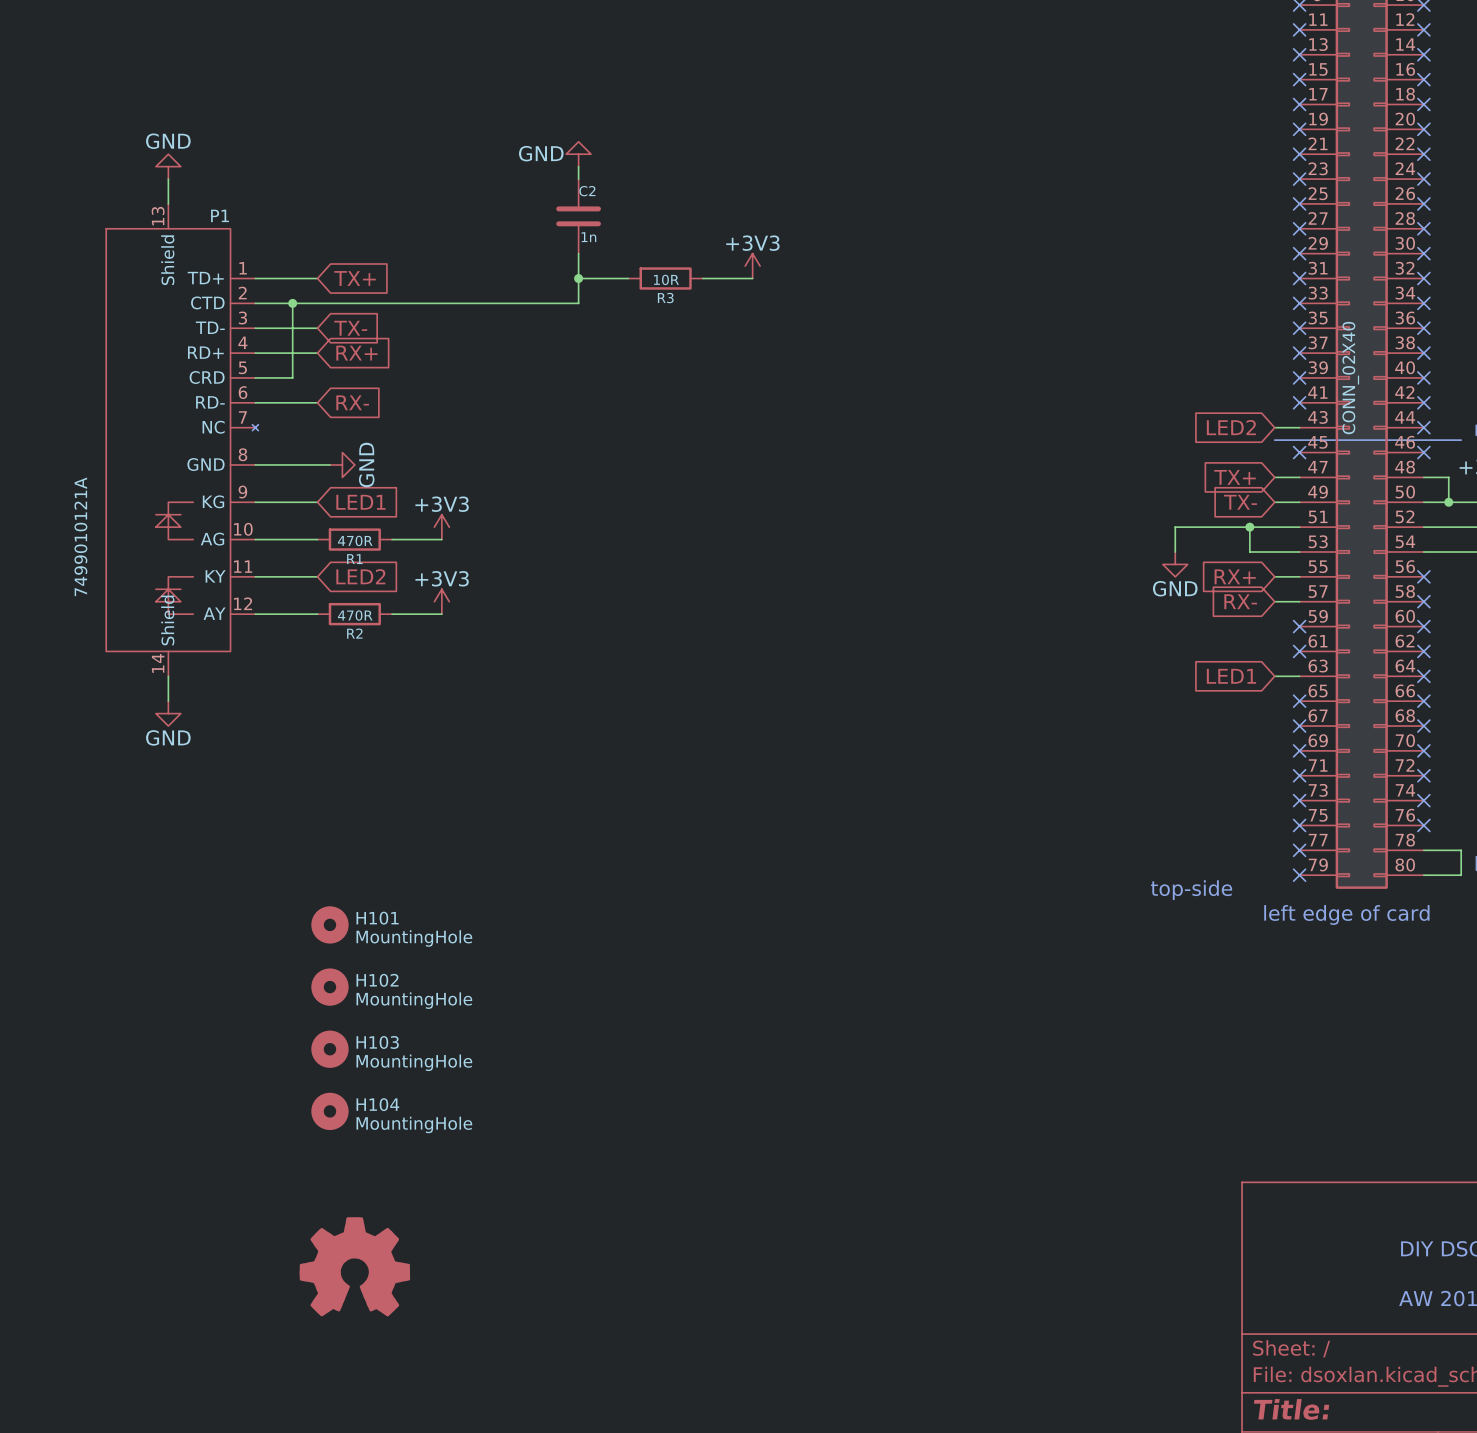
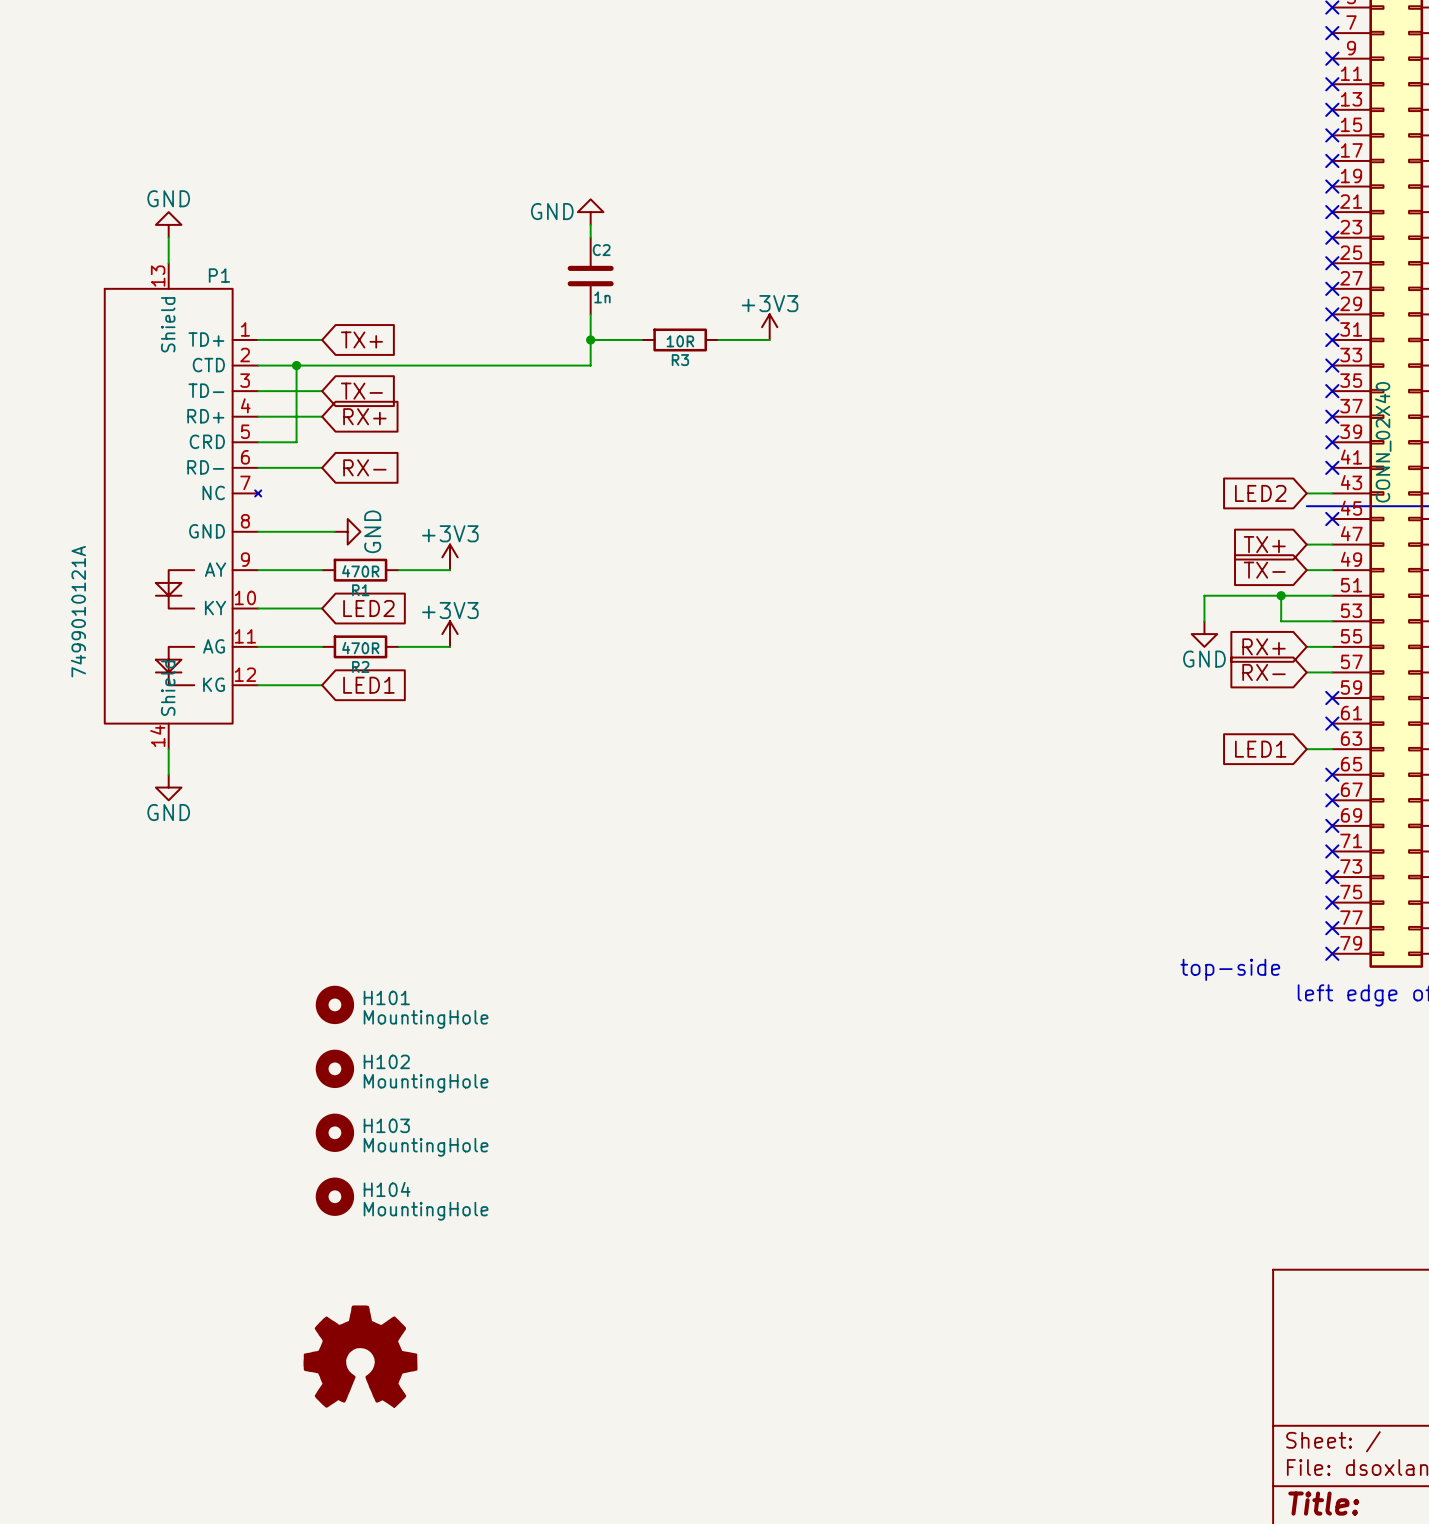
P1 symbol: [106, 203, 259, 677] -> [104, 263, 262, 750]
power symbol: none -> +3V3 (450, 557)
global label position: LED1 (360, 502) -> LED1 (368, 685)
power symbol: +3V3 (441, 527) -> none
R1 position: (354, 539) -> (360, 570)
wire: (392, 539) (441, 539) -> (398, 570) (450, 570)
power symbol: none -> +3V3 (450, 634)
global label position: LED2 (360, 576) -> LED2 (368, 608)
power symbol: +3V3 (441, 601) -> none
R2 position: (354, 614) -> (360, 646)
wire: (392, 614) (441, 614) -> (398, 646) (450, 646)

